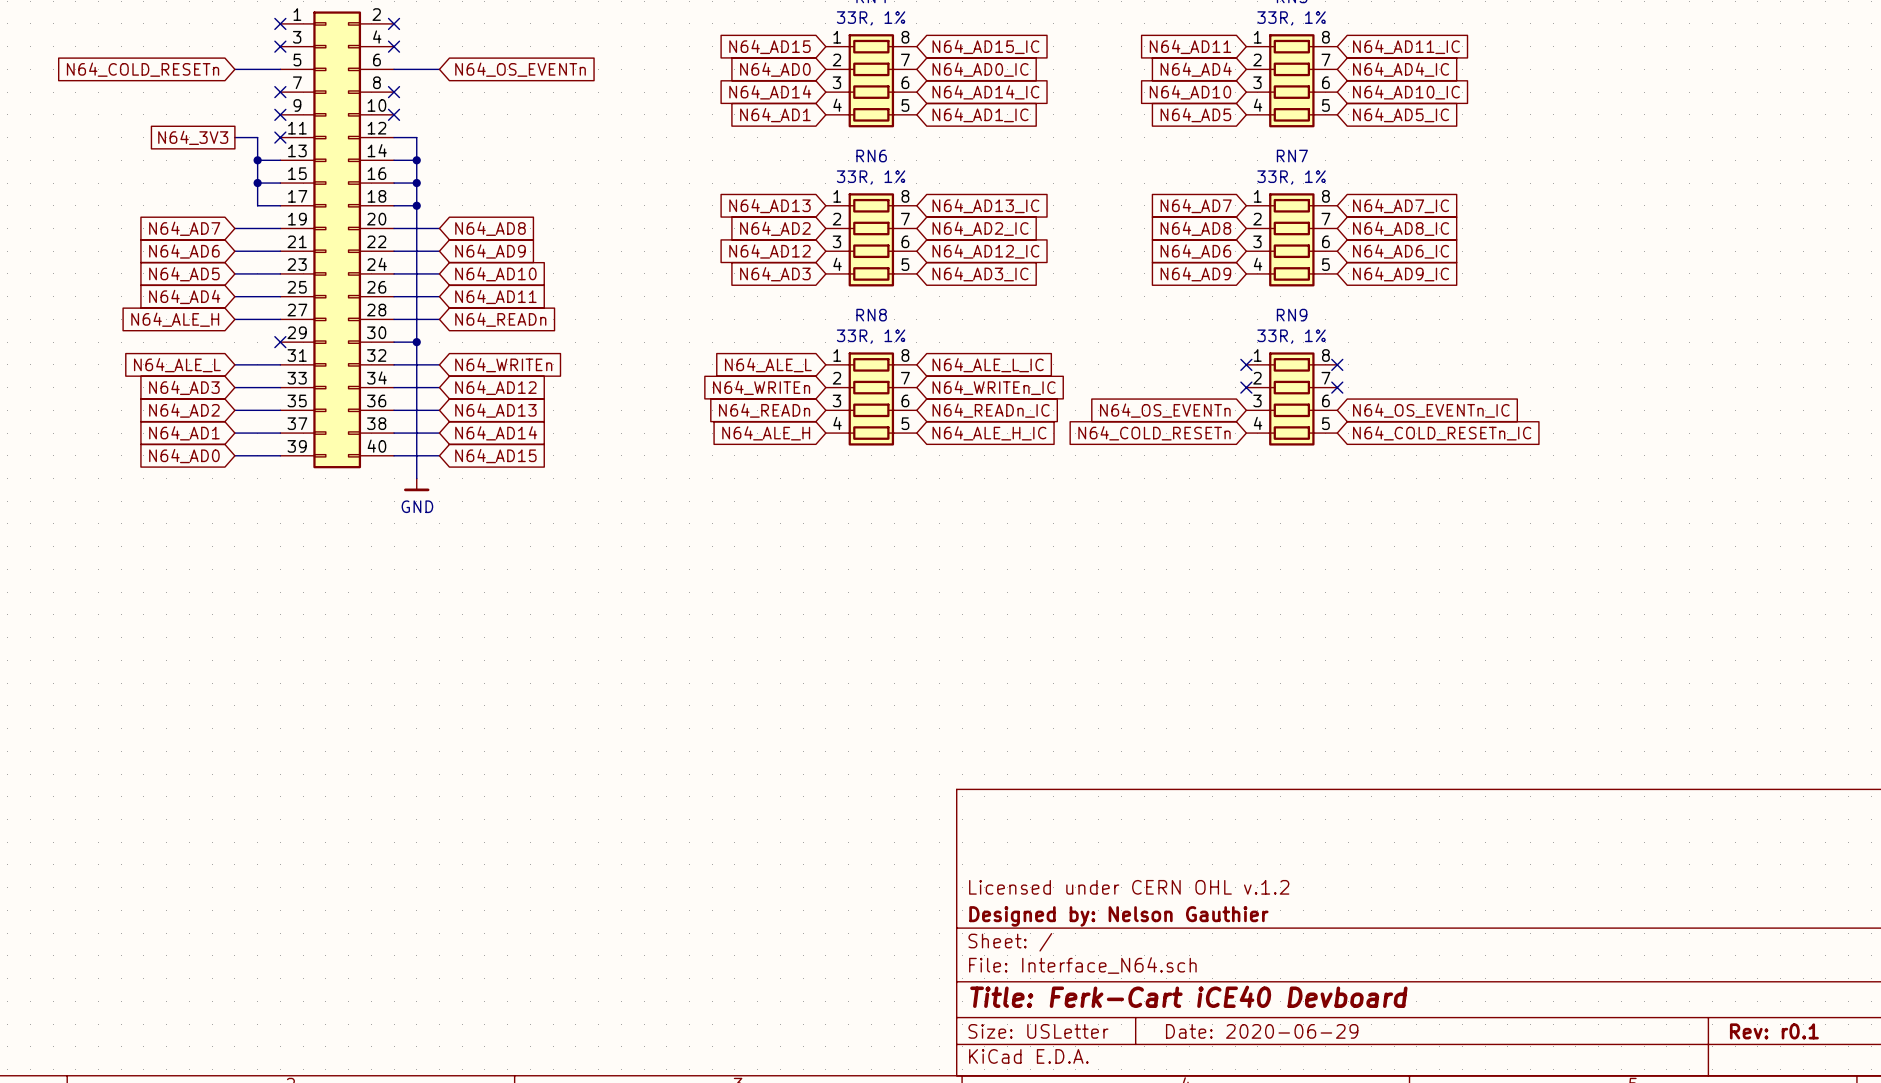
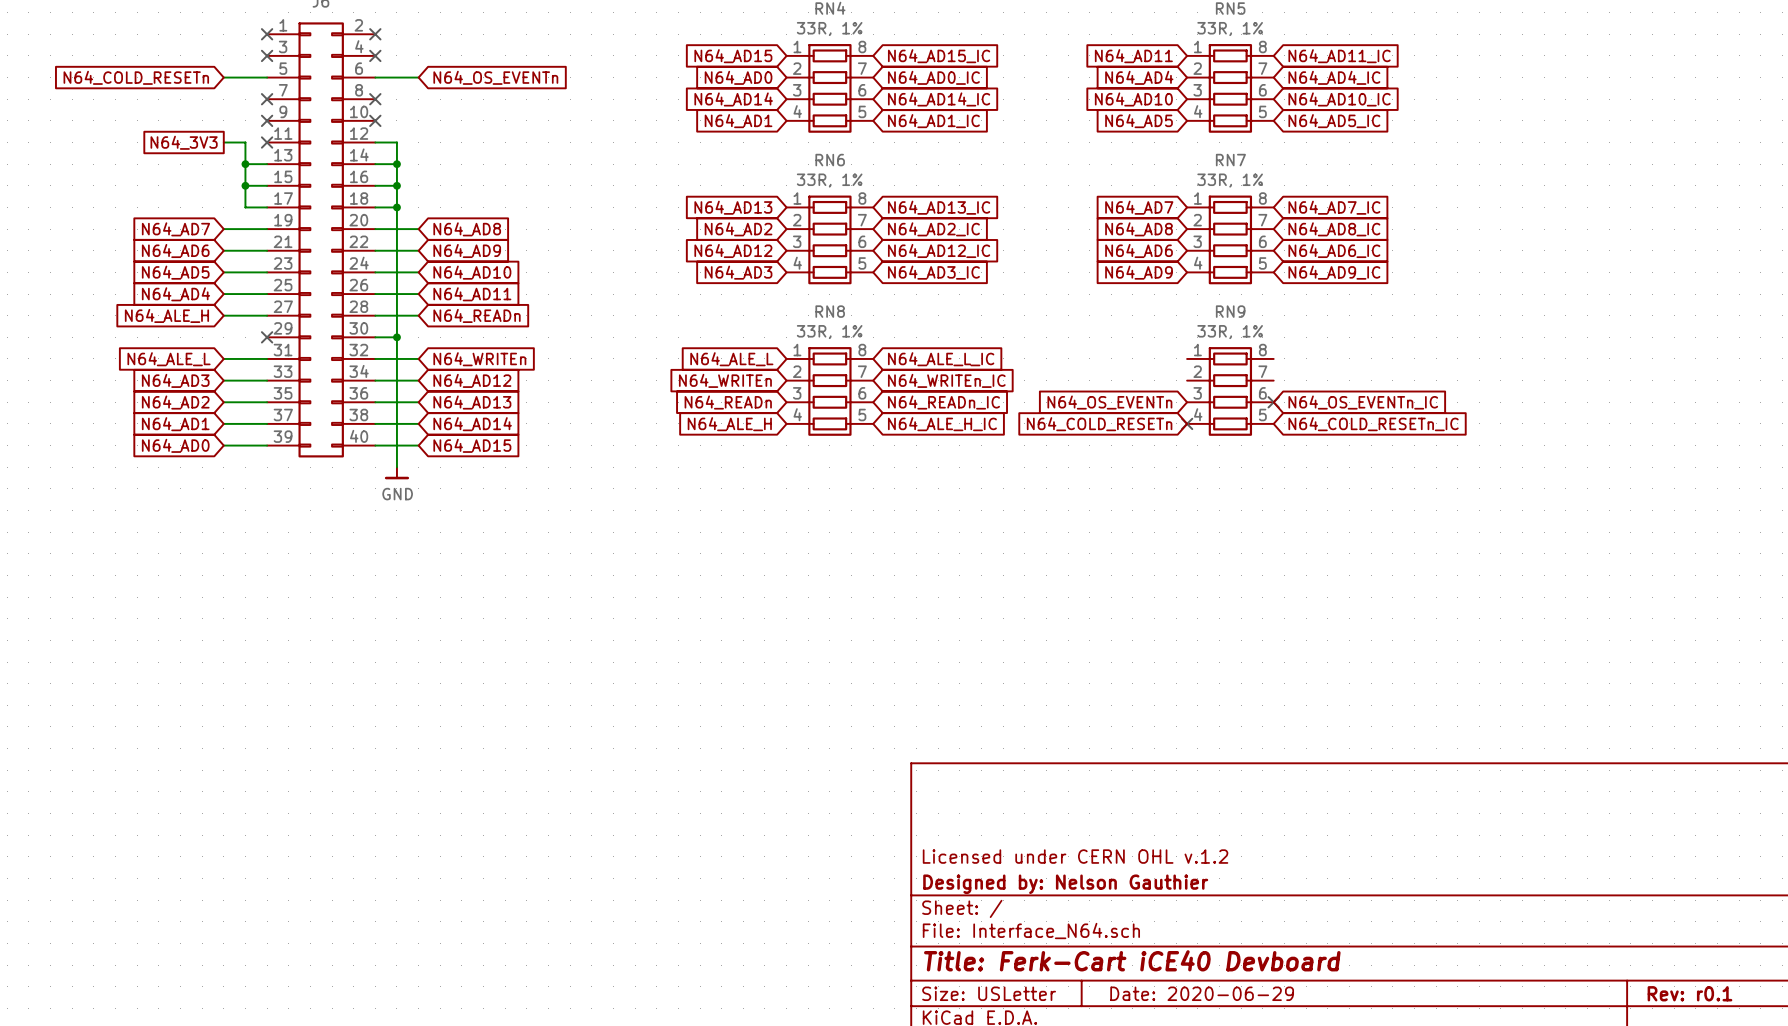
no-connect mark: (1246, 364) -> none
no-connect mark: (1337, 364) -> none
no-connect mark: (1246, 387) -> none
no-connect mark: (1337, 387) -> none
no-connect mark: none -> (1273, 402)
no-connect mark: none -> (1187, 423)

